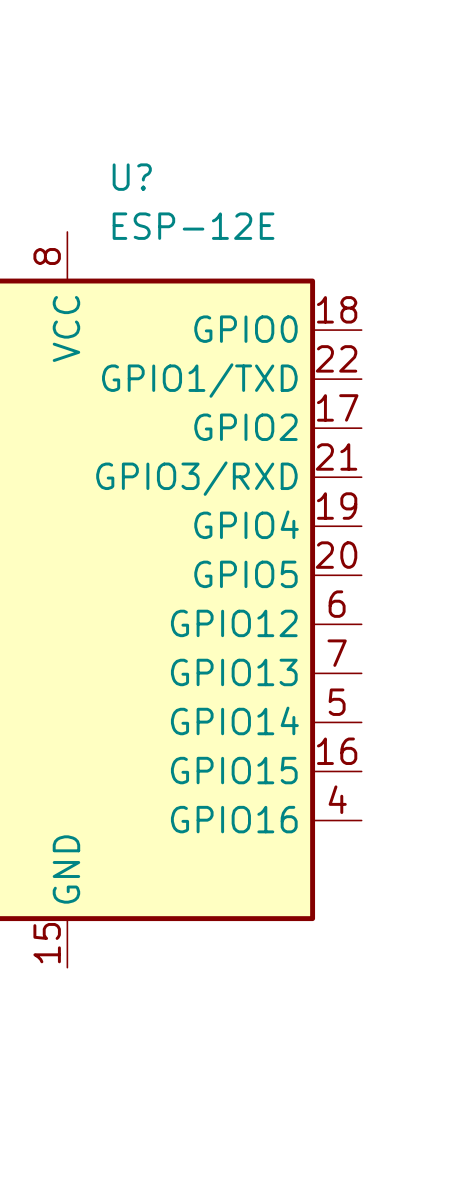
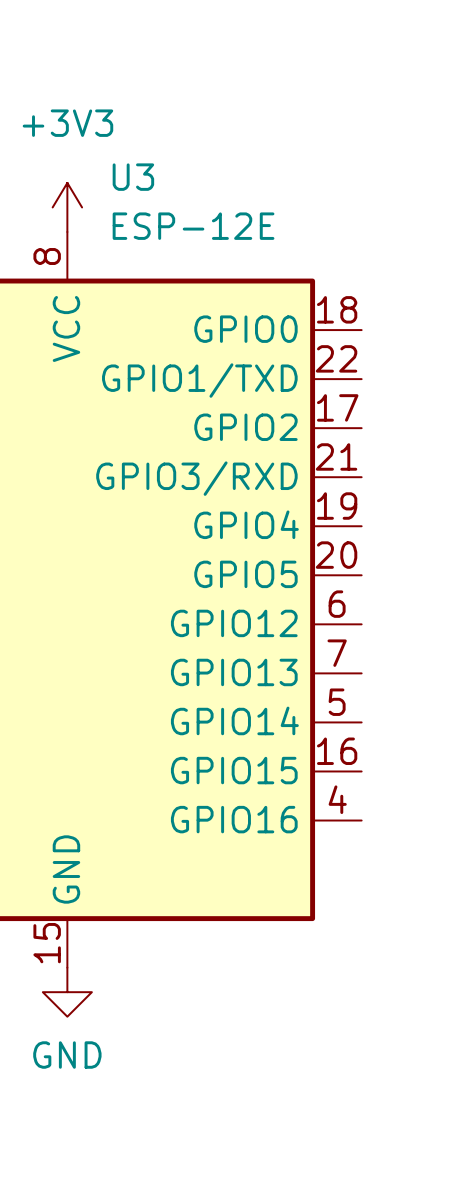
U? name: U? (132, 177) -> U3 (133, 177)
power symbol: none -> +3V3 (67, 207)
power symbol: none -> GND (67, 992)

